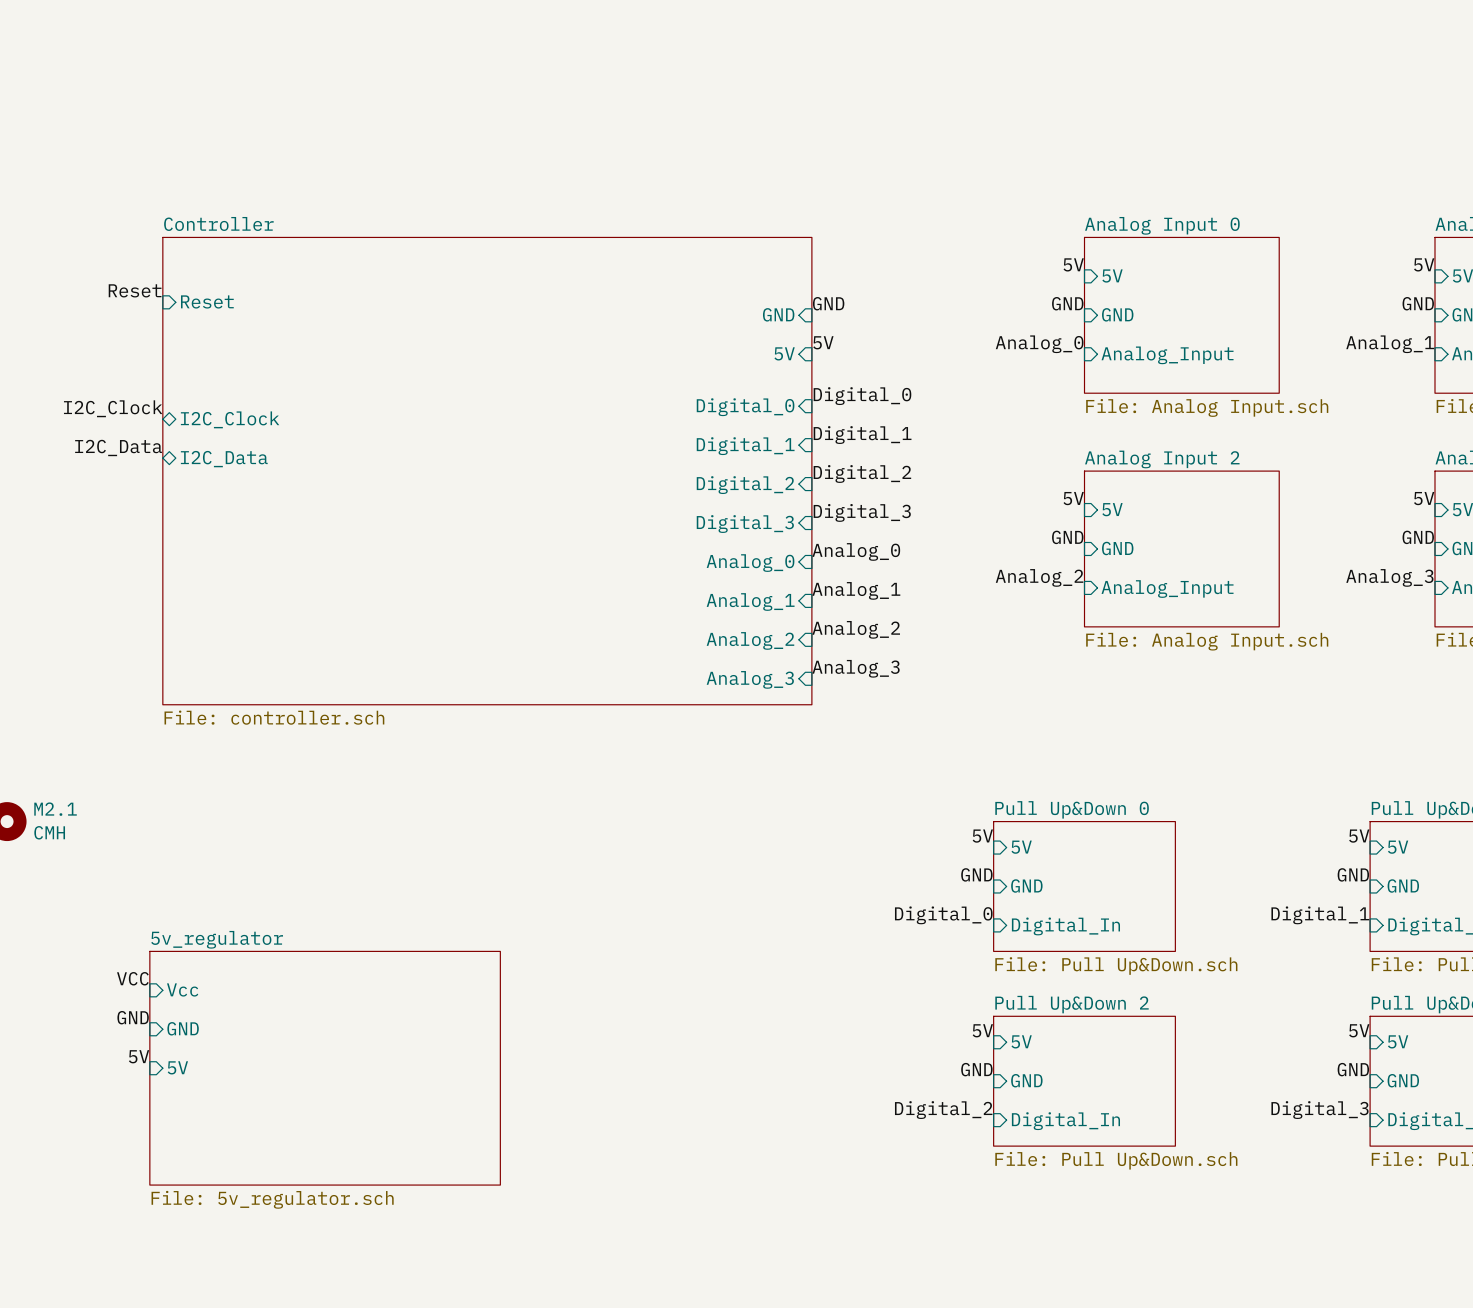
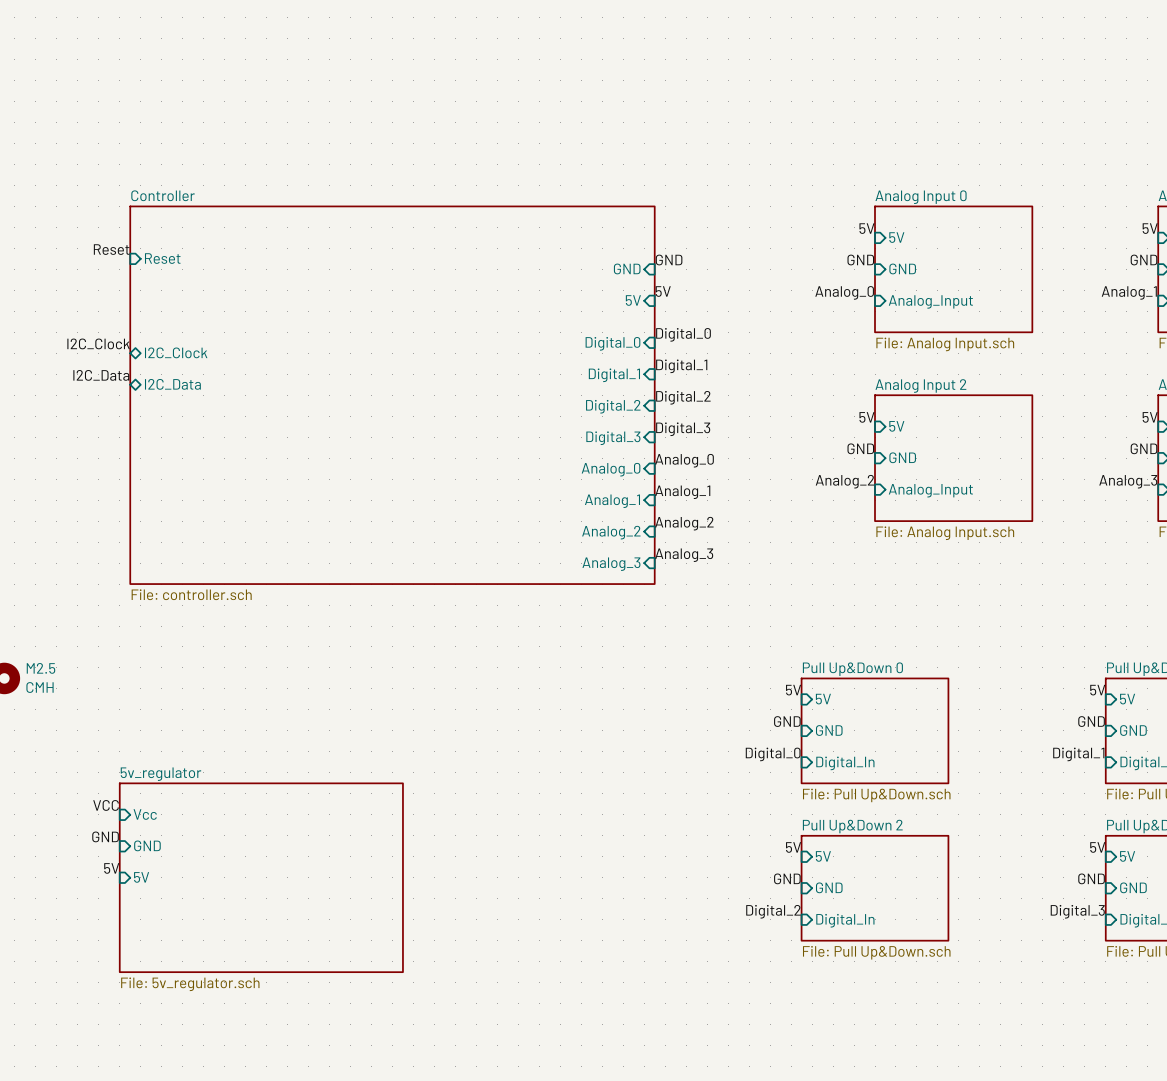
M2.1 name: M2.1 (55, 809) -> M2.5 (40, 668)

